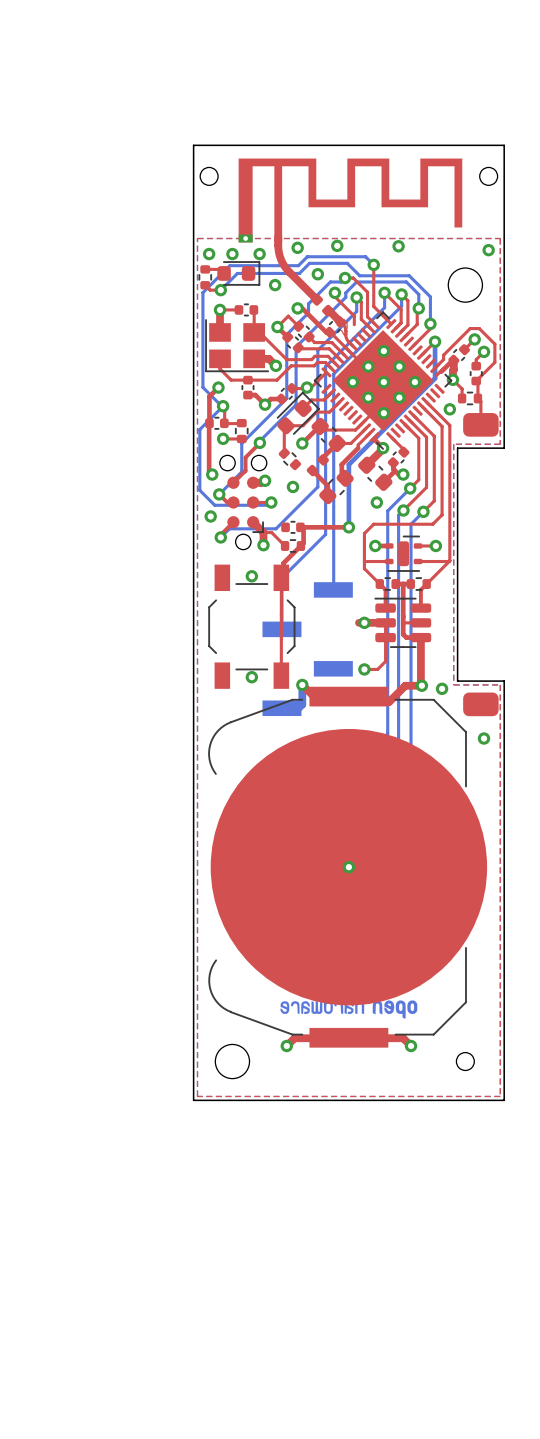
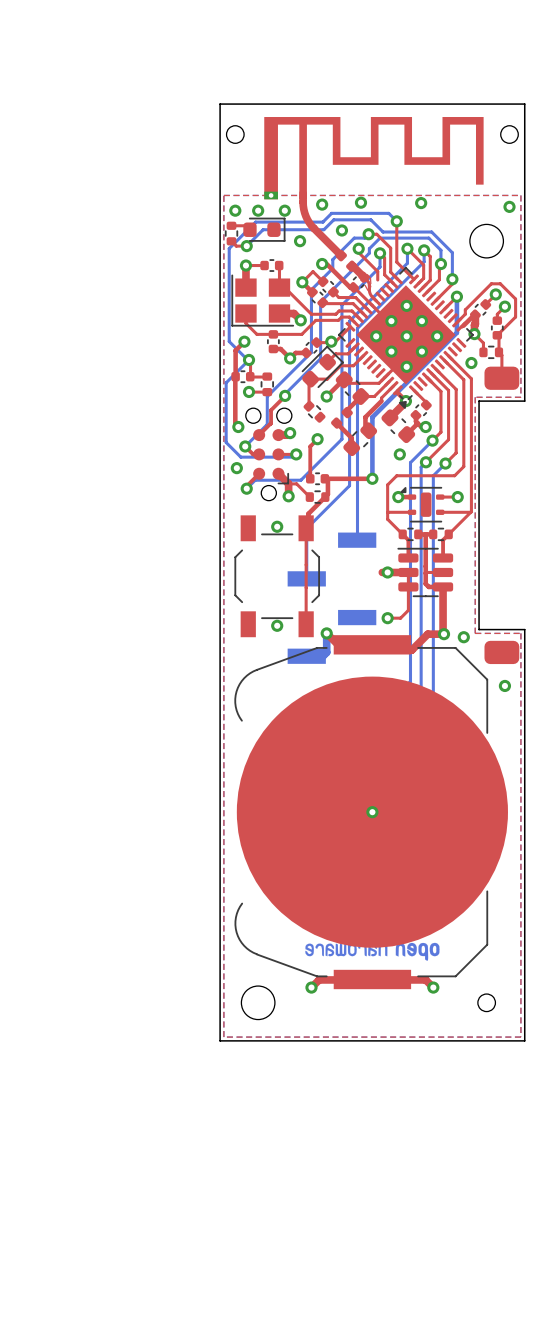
part footprint: [313, 311, 453, 450] -> [338, 266, 474, 409]
top track: none -> (317, 439) (310, 446) (310, 478)
part footprint: [385, 535, 423, 572] -> [400, 486, 445, 523]

